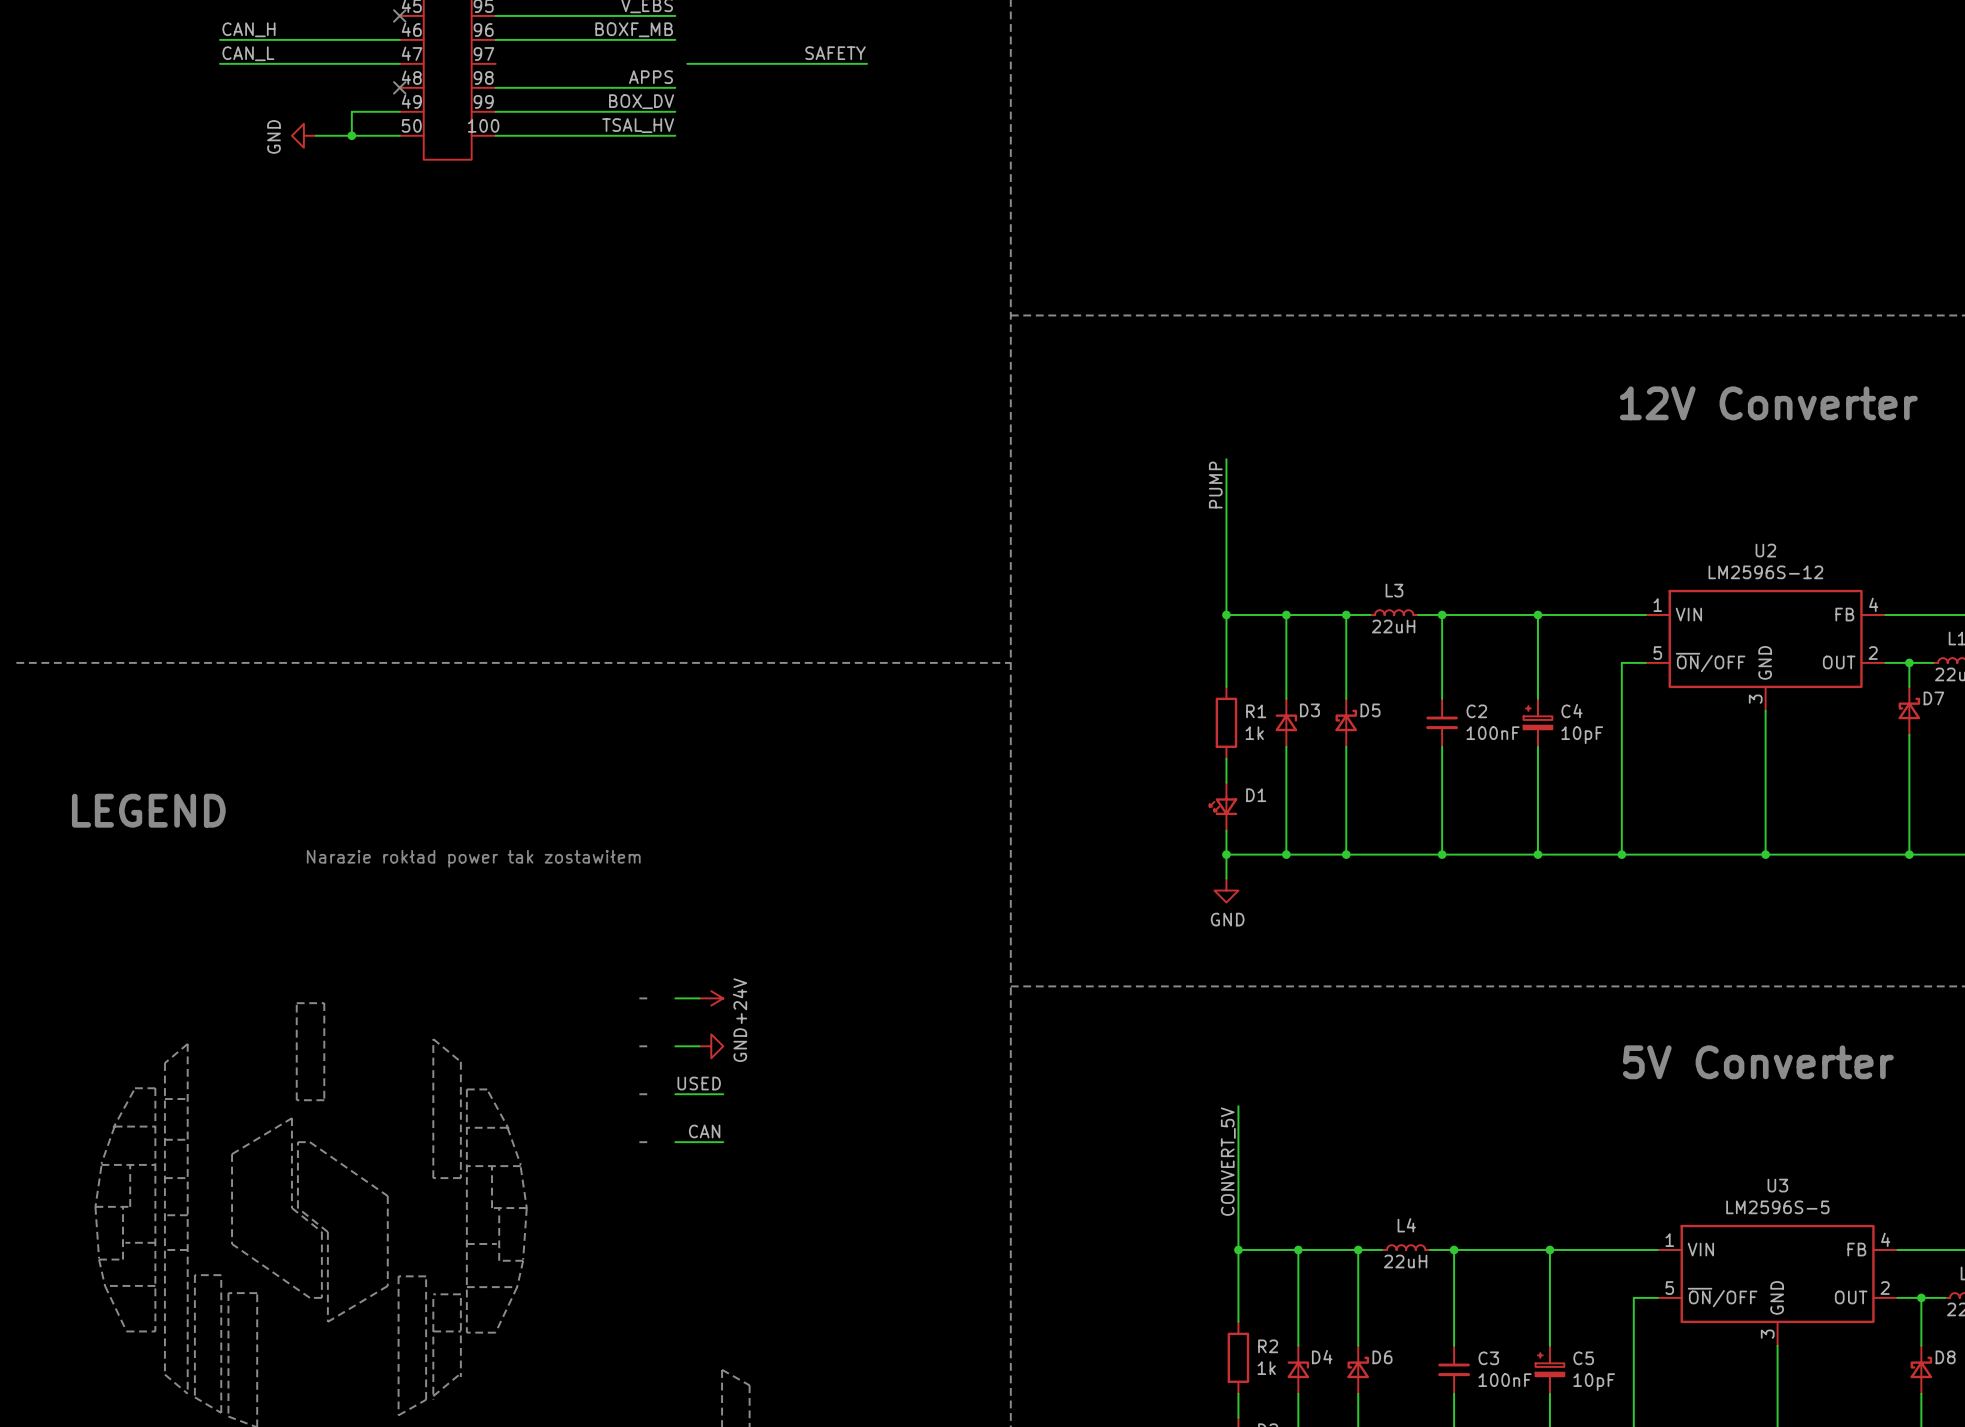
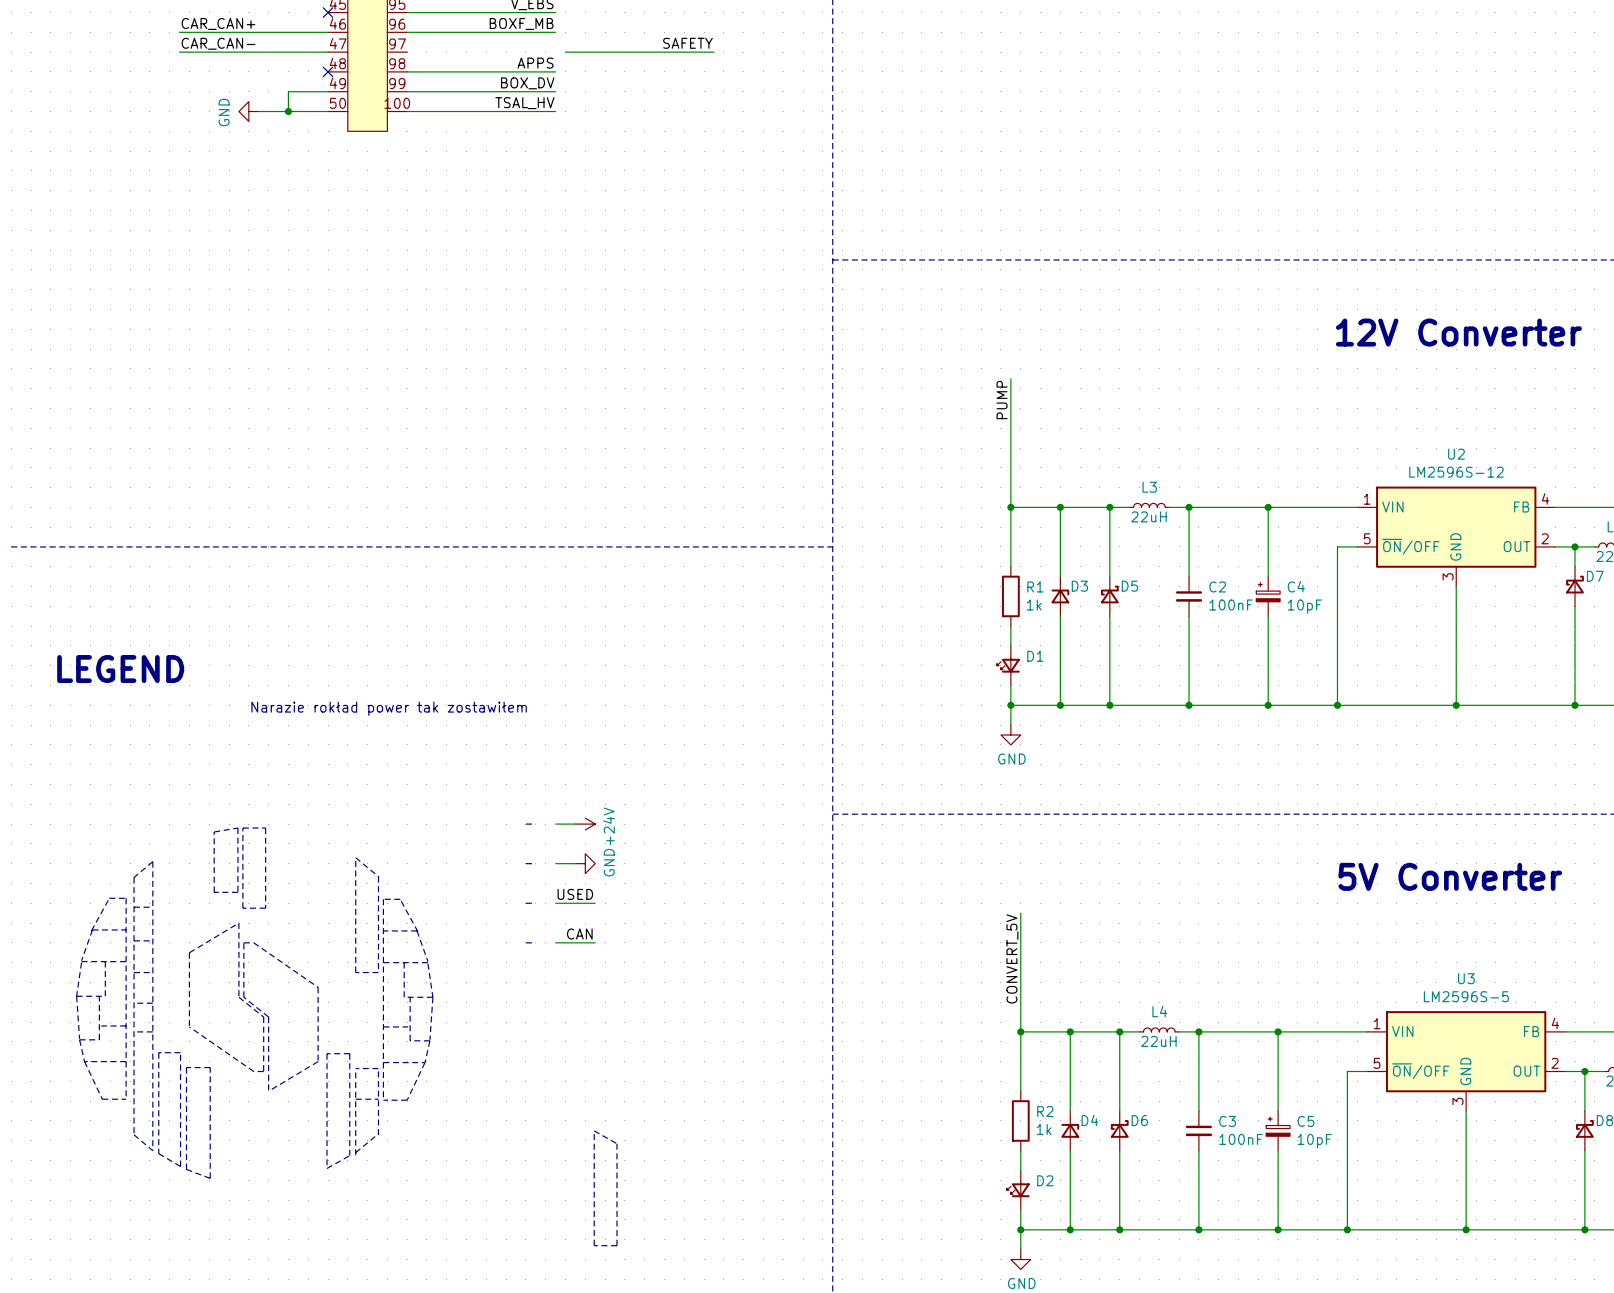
label: CAN_H (248, 29) -> CAR_CAN+ (218, 23)
label: CAN_L (248, 53) -> CAR_CAN- (218, 43)
line: none -> (237, 828) (214, 831) (214, 892) (237, 892) (237, 828)

